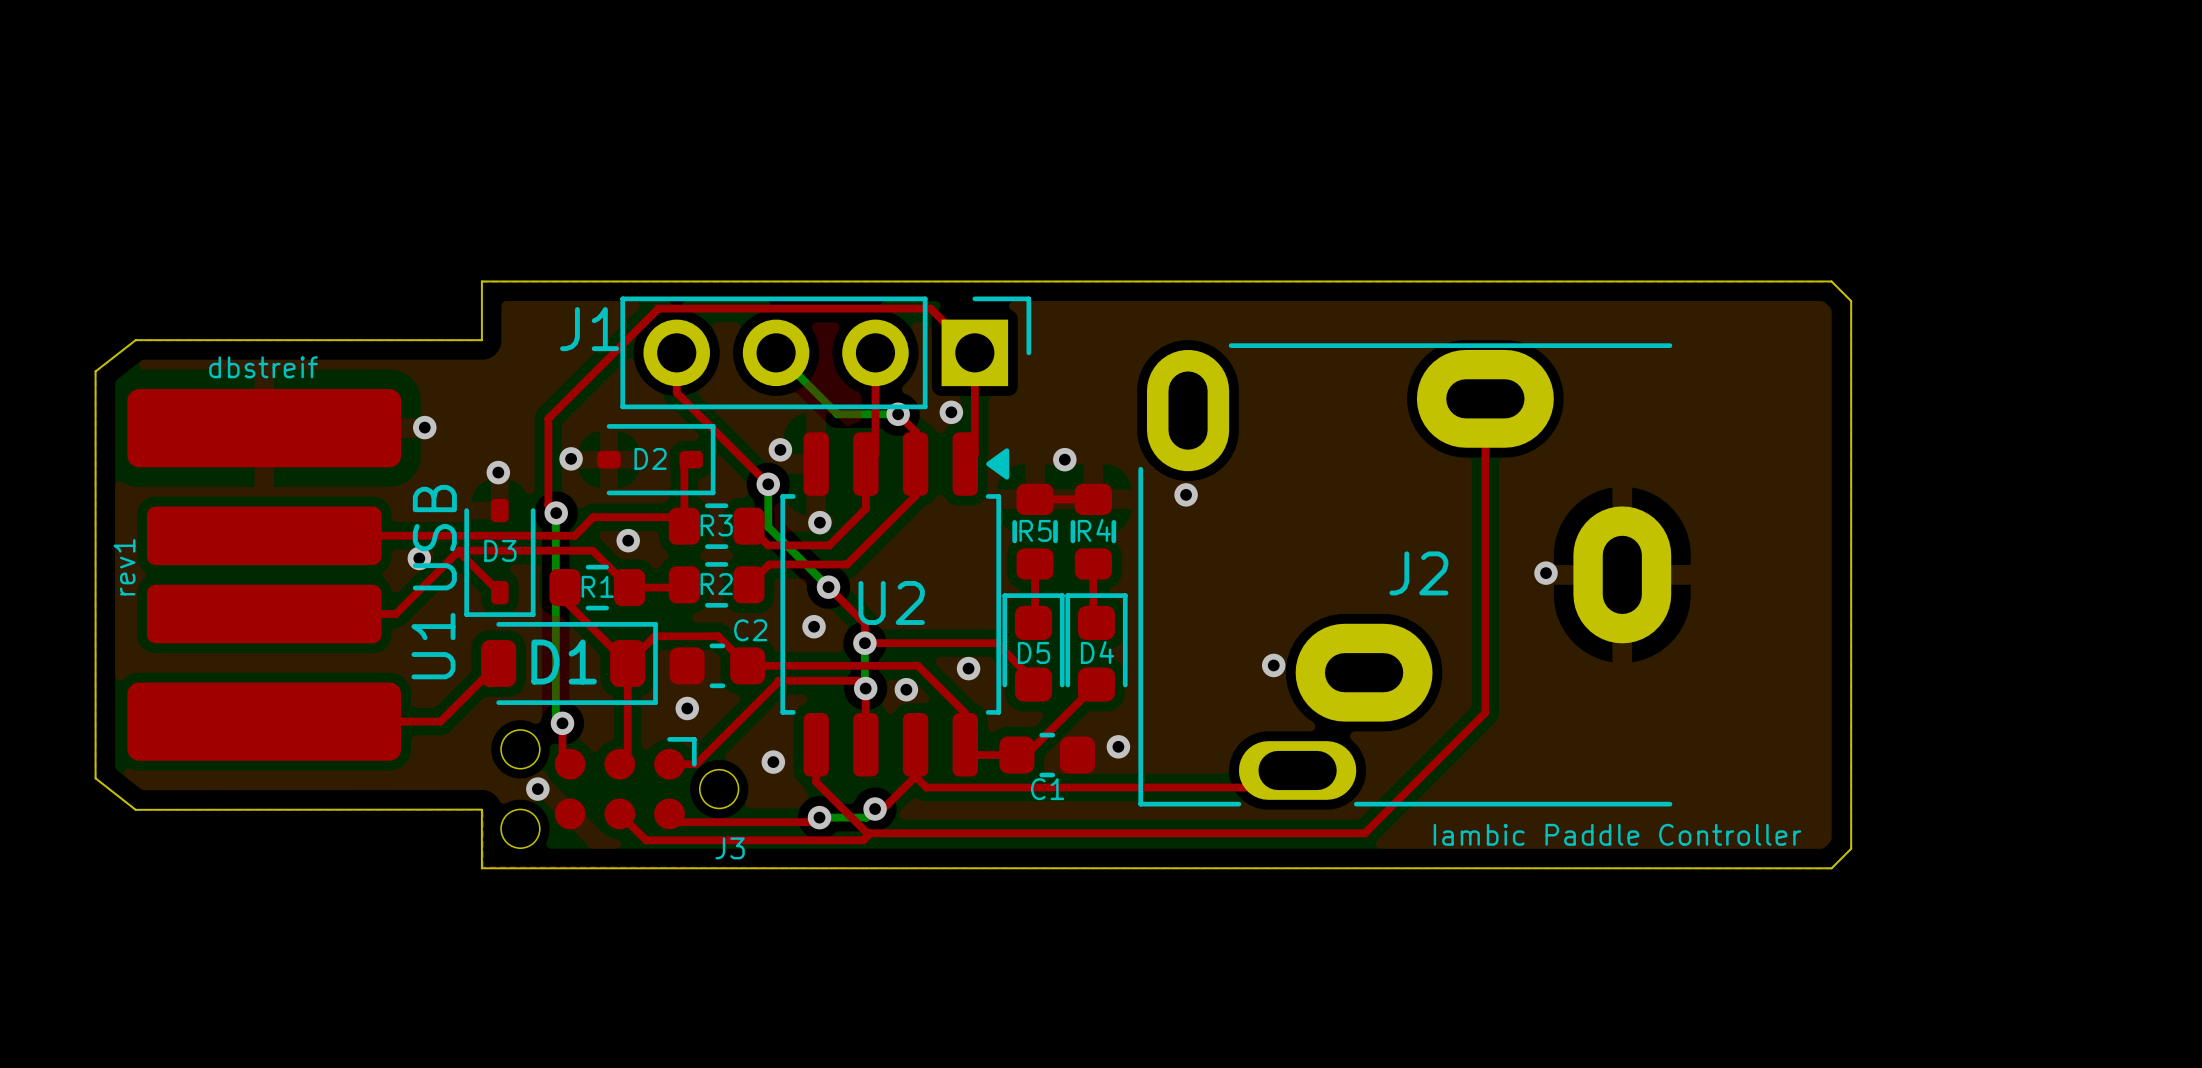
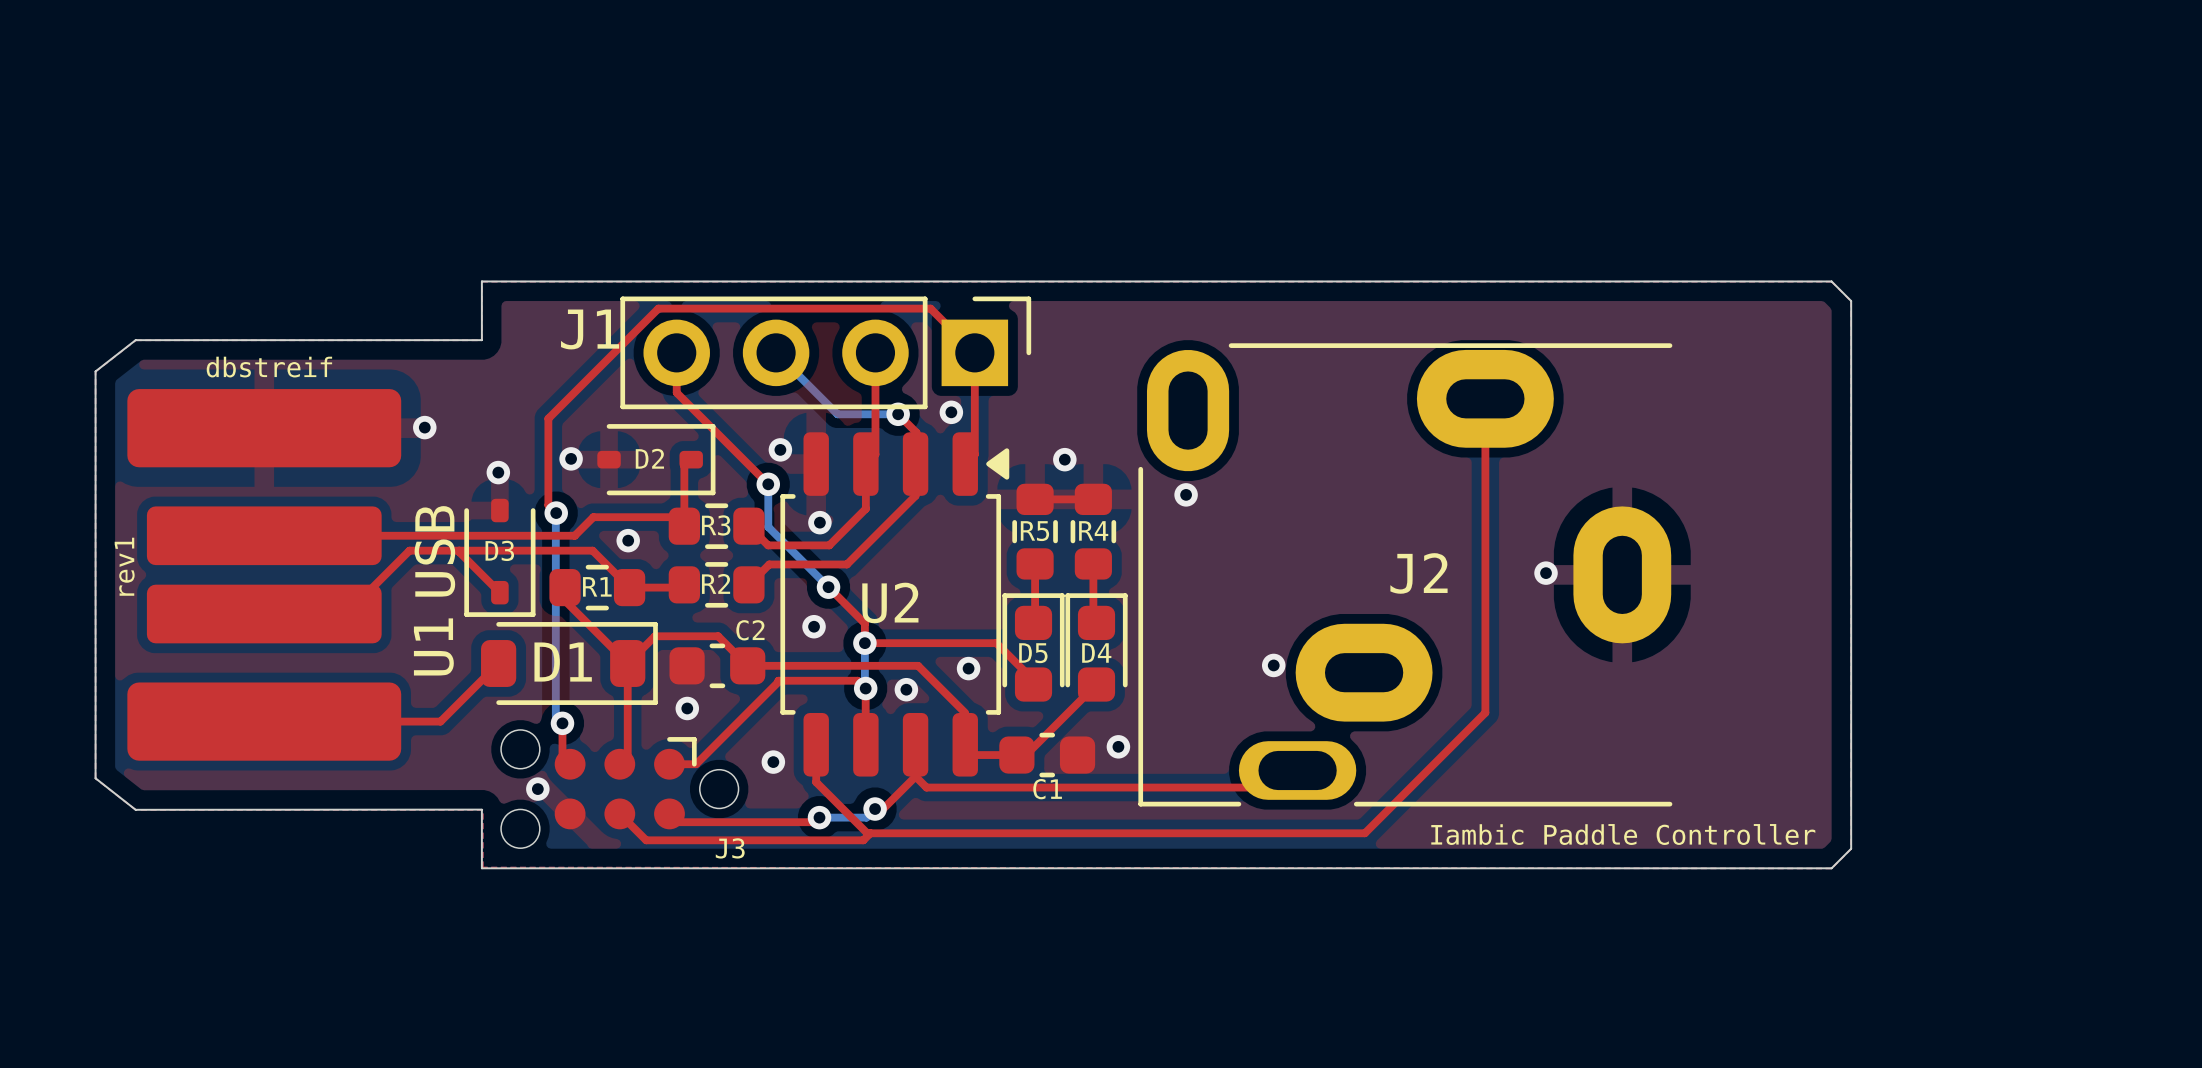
top track: (459, 550) (395, 614) (346, 614) -> (459, 550) (409, 550) (346, 614)
via: (419, 558) -> none

